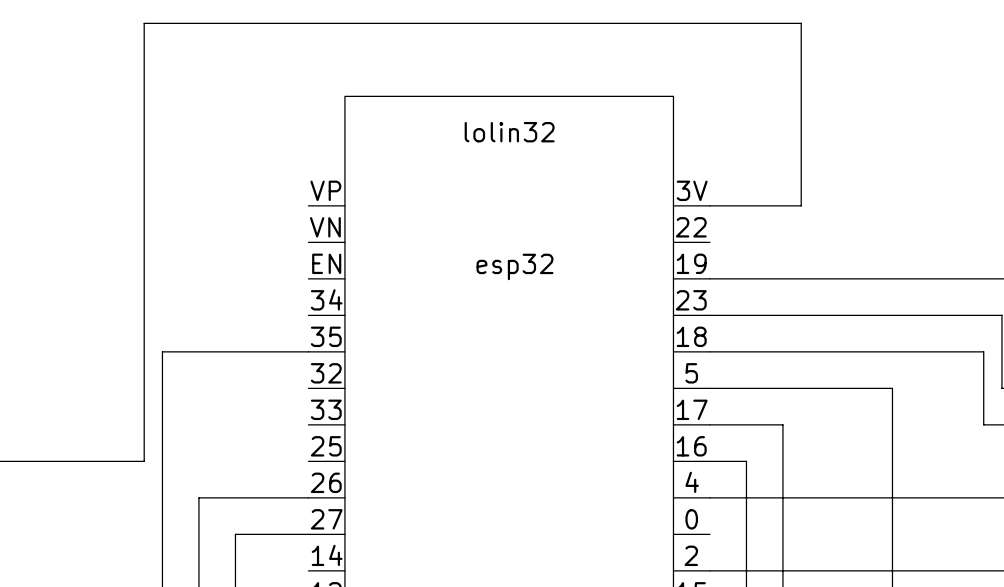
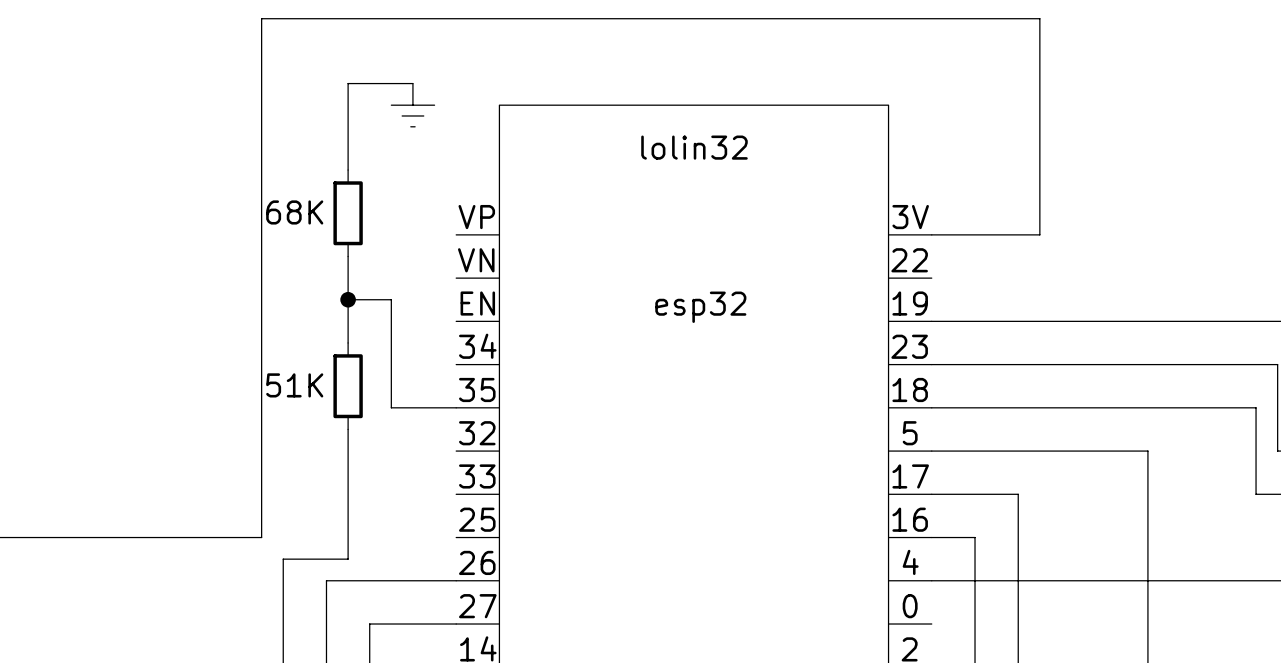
wire: none -> (412, 83) (348, 83) (348, 170)
power symbol: none -> (412, 105)
part: none -> 68K (348, 213)
wire: none -> (348, 256) (348, 342)
wire: none -> (348, 299) (391, 299) (391, 407)
junction: none -> (348, 299)
part: none -> 51K (348, 386)
wire: (253, 351) (162, 351) (162, 479) -> (348, 429) (348, 559) (283, 559)

